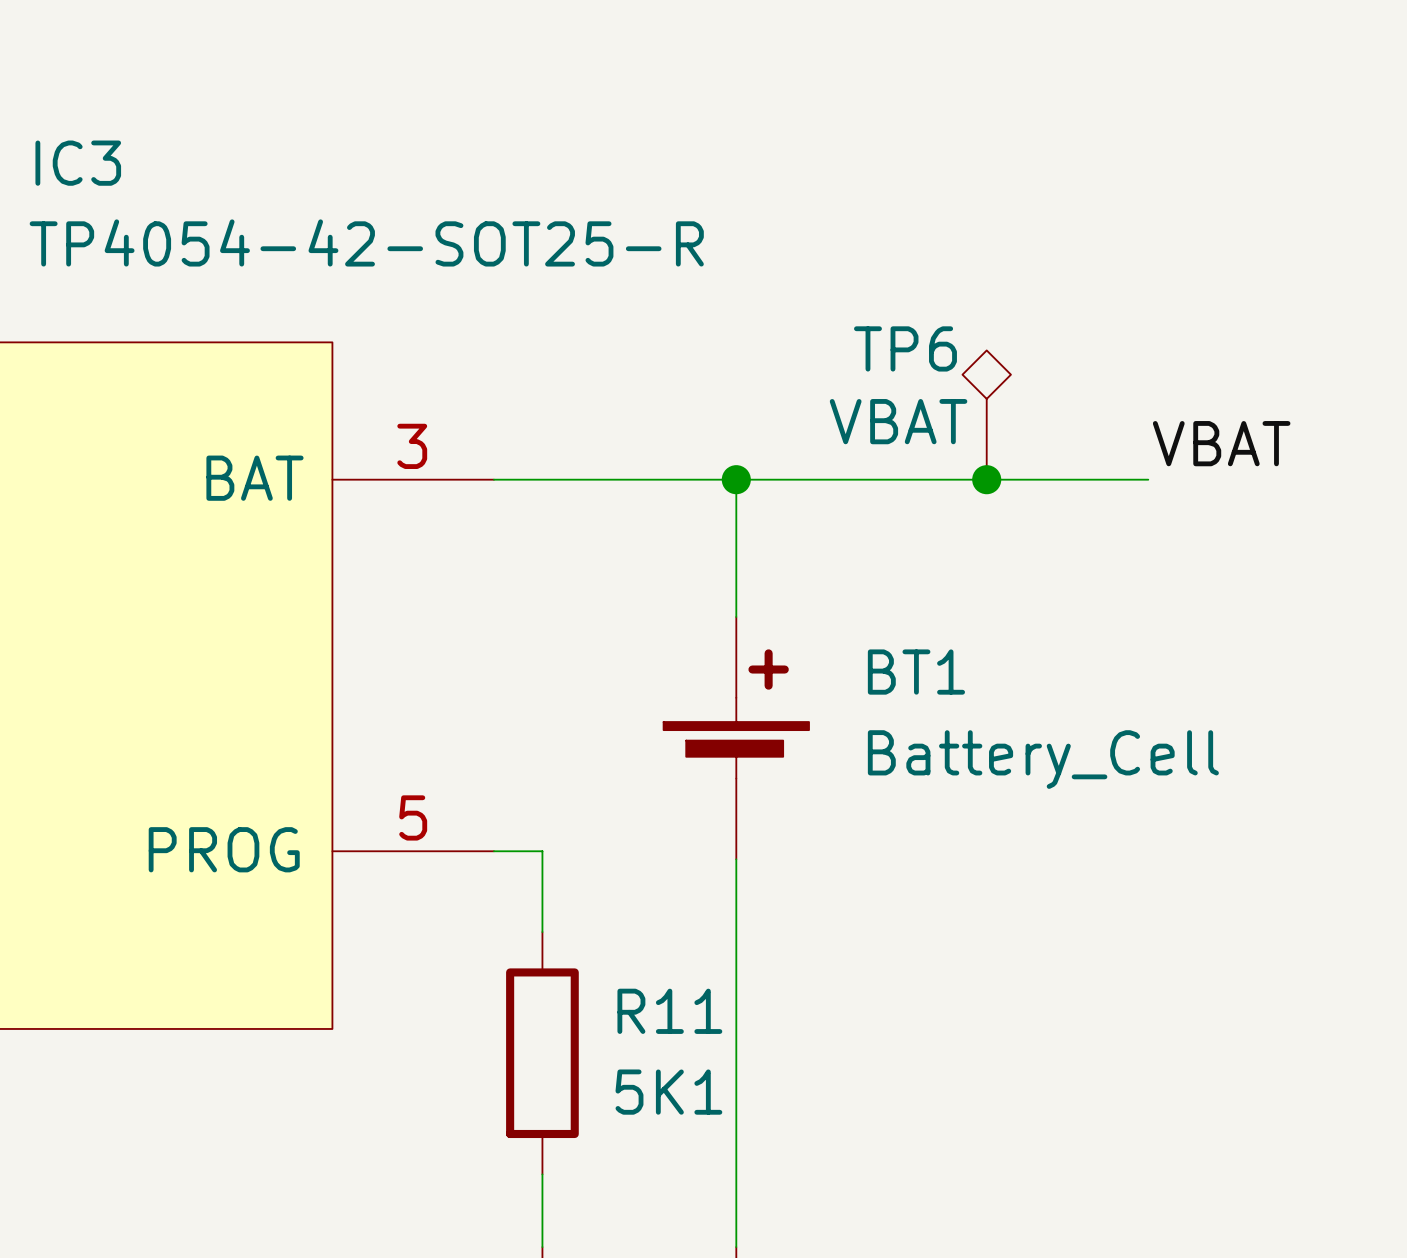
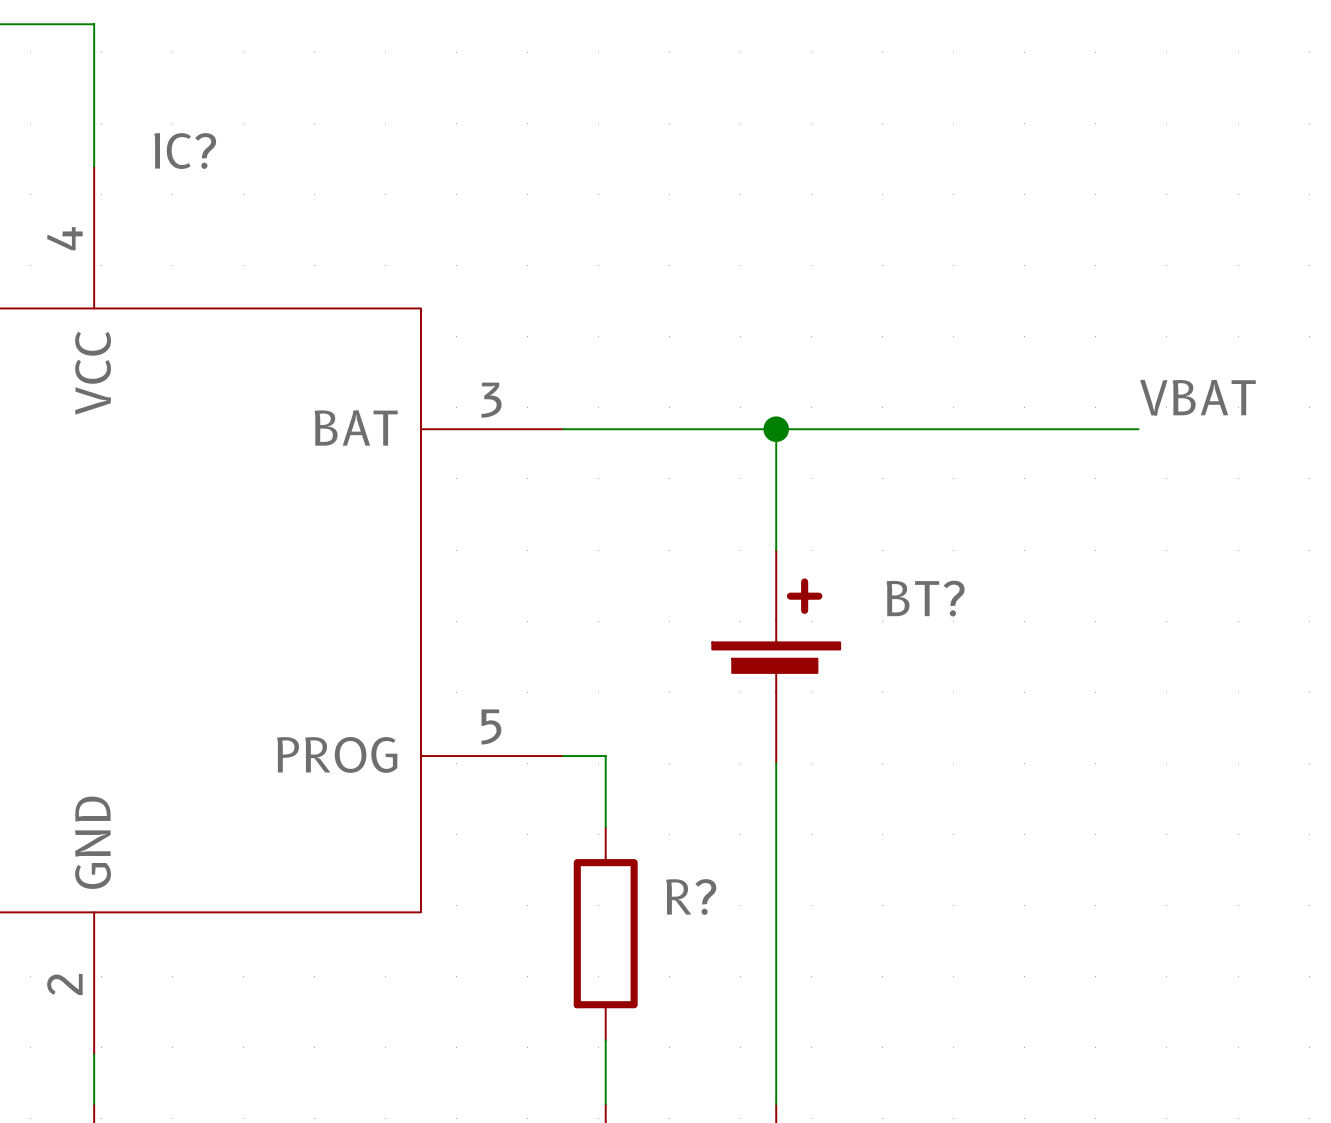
IC3 name: IC3 (78, 163) -> IC? (185, 151)
IC3 value: TP4054-42-SOT25-R (366, 242) -> none
TP6: VBAT (986, 415) -> none
junction: (986, 479) -> none
BT1 name: BT1 (916, 672) -> BT? (925, 598)
BT1 value: Battery_Cell (1043, 759) -> none
R11 name: R11 (669, 1011) -> R? (691, 897)
R11 value: 5K1 (668, 1092) -> none

